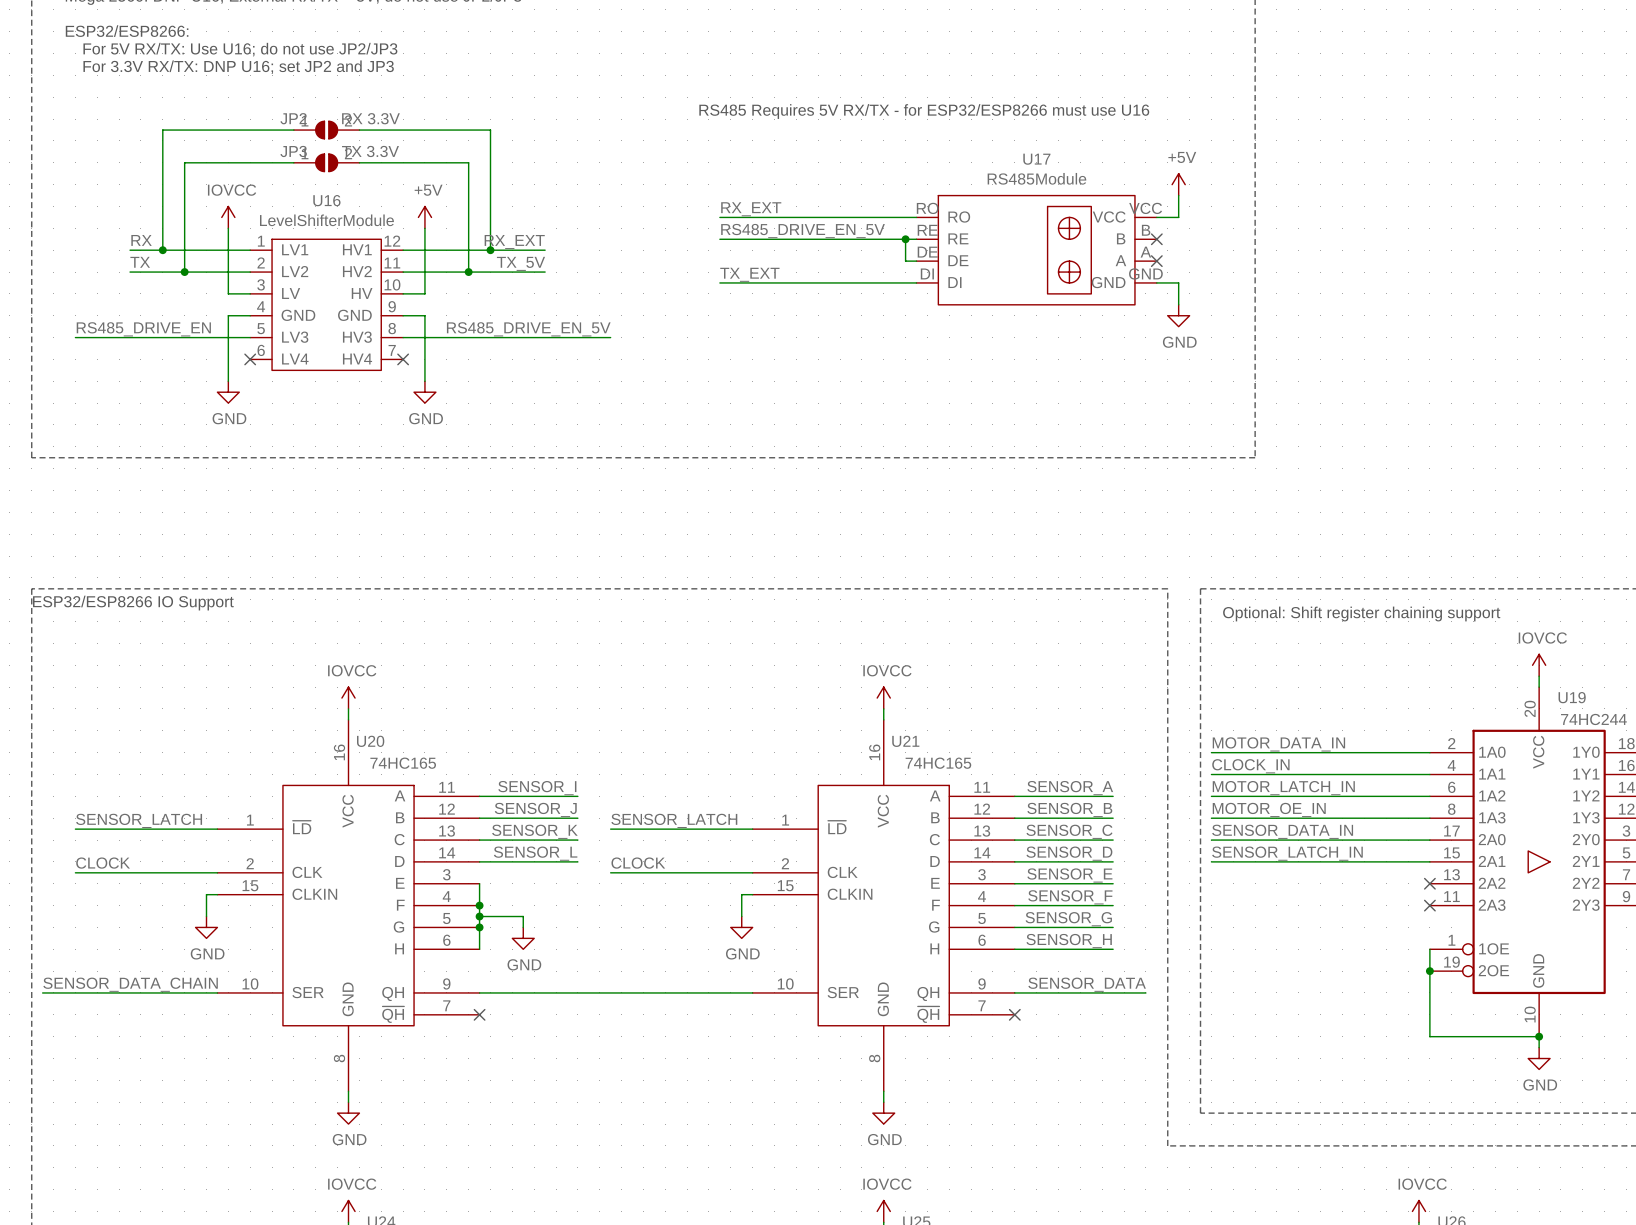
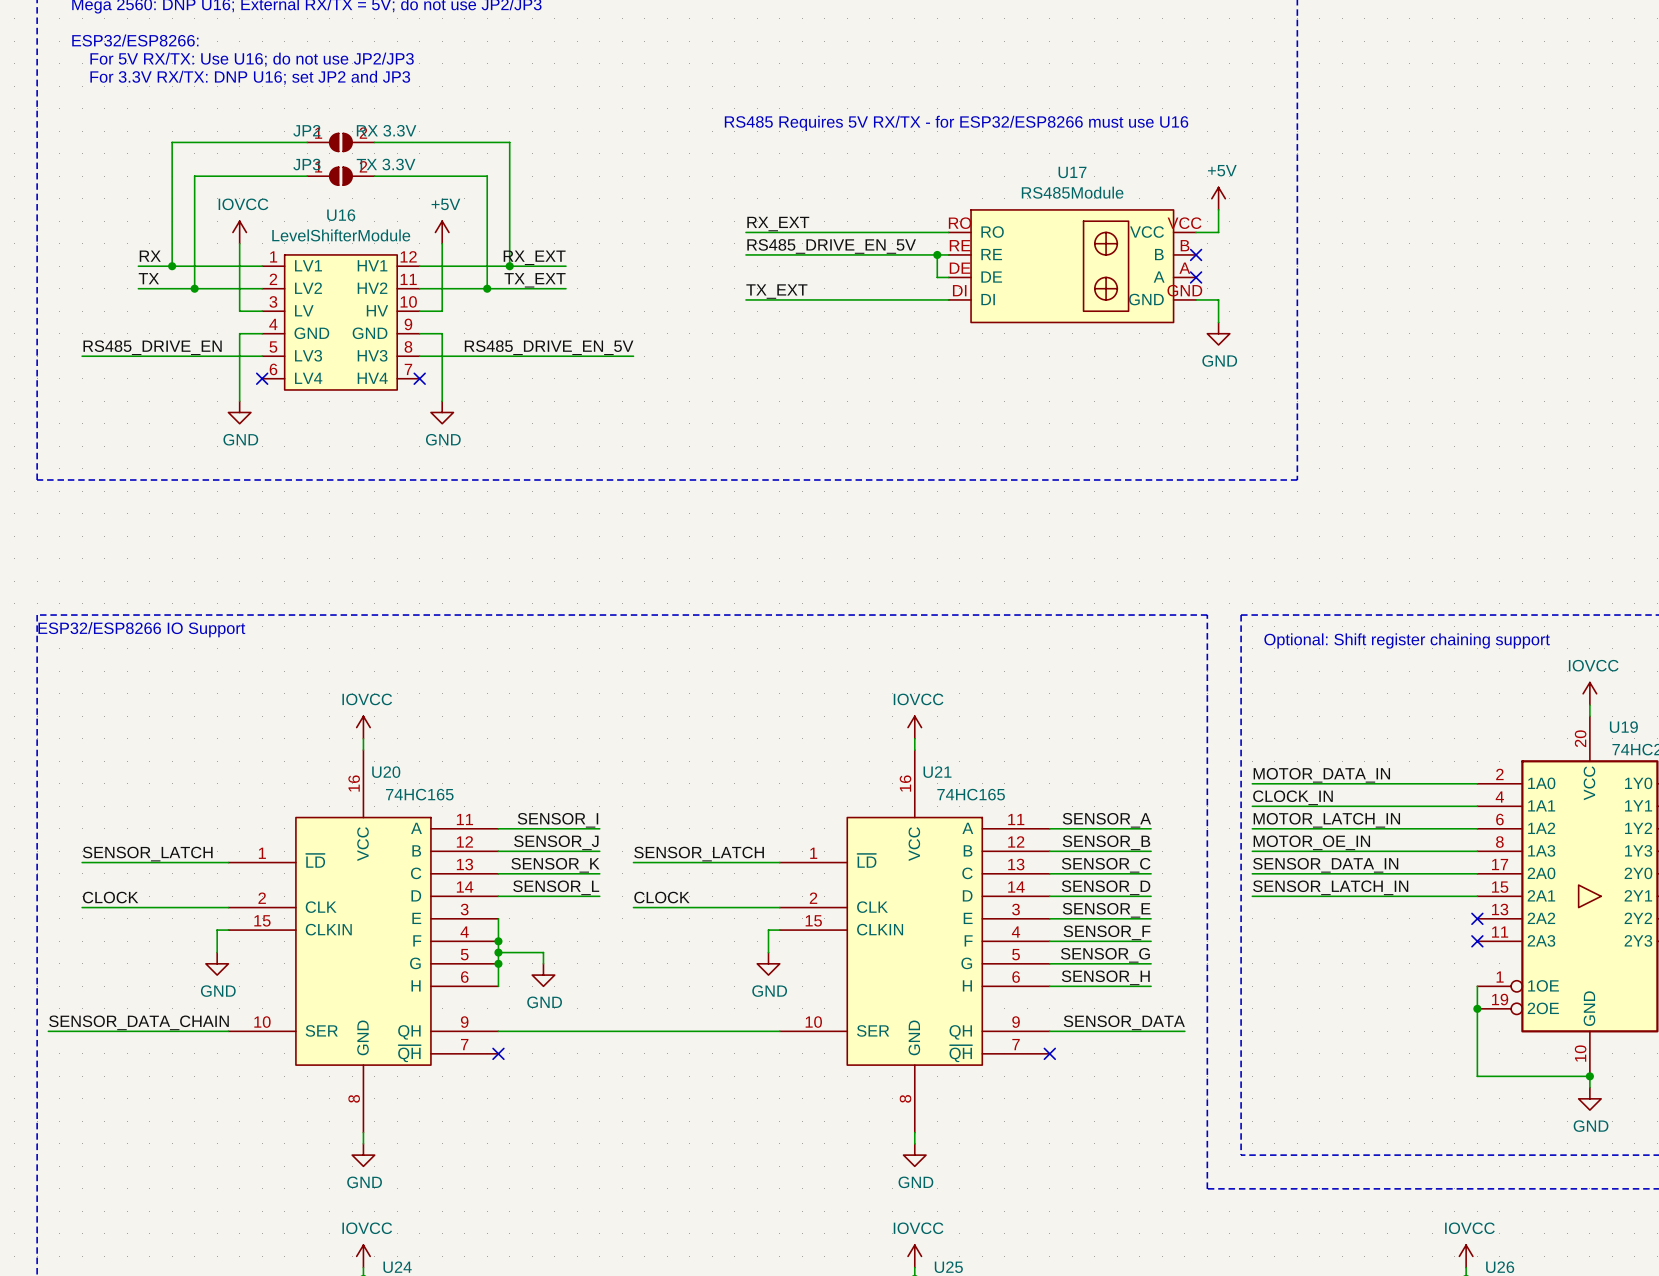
label: TX_5V (520, 263) -> TX_EXT (535, 280)

